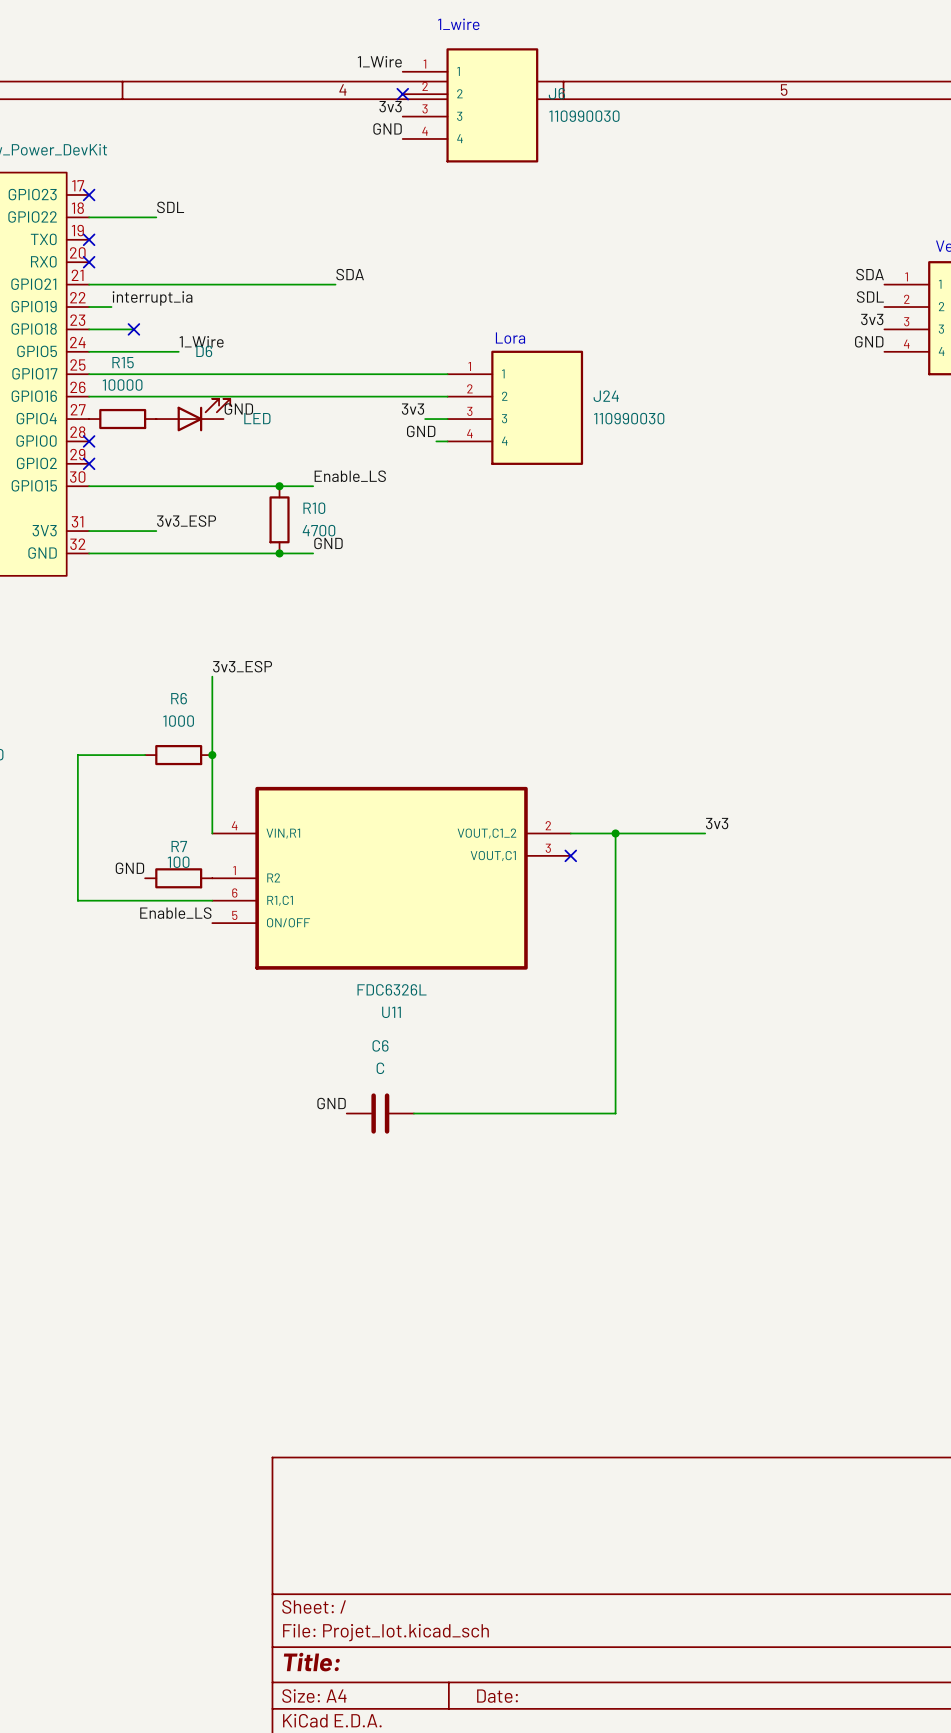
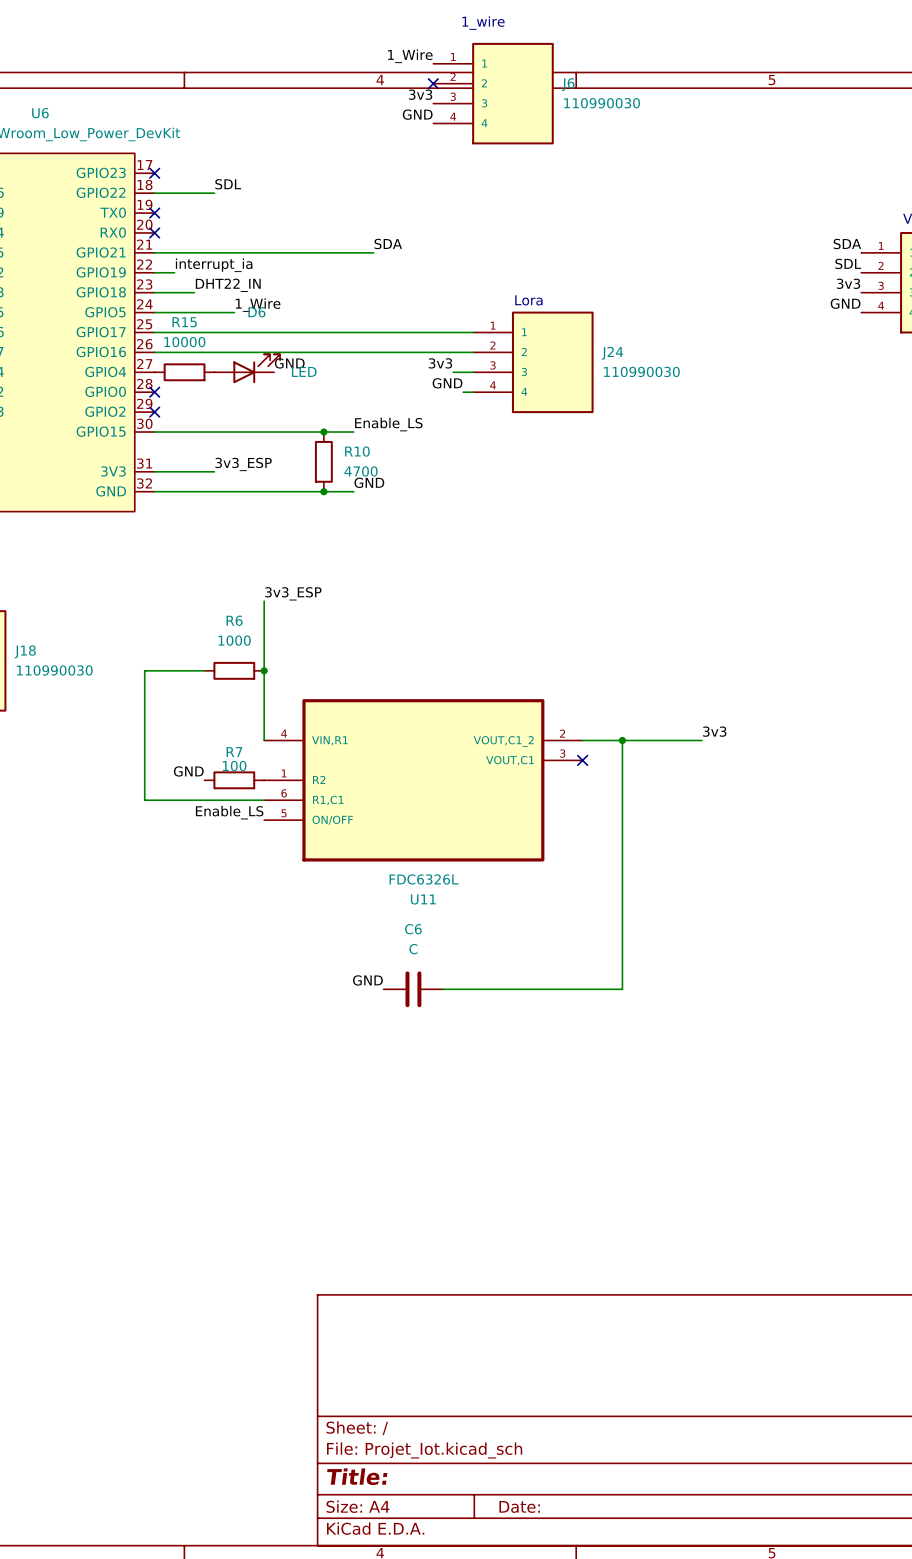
label: none -> DHT22_IN (228, 285)
no-connect mark: (133, 329) -> none

